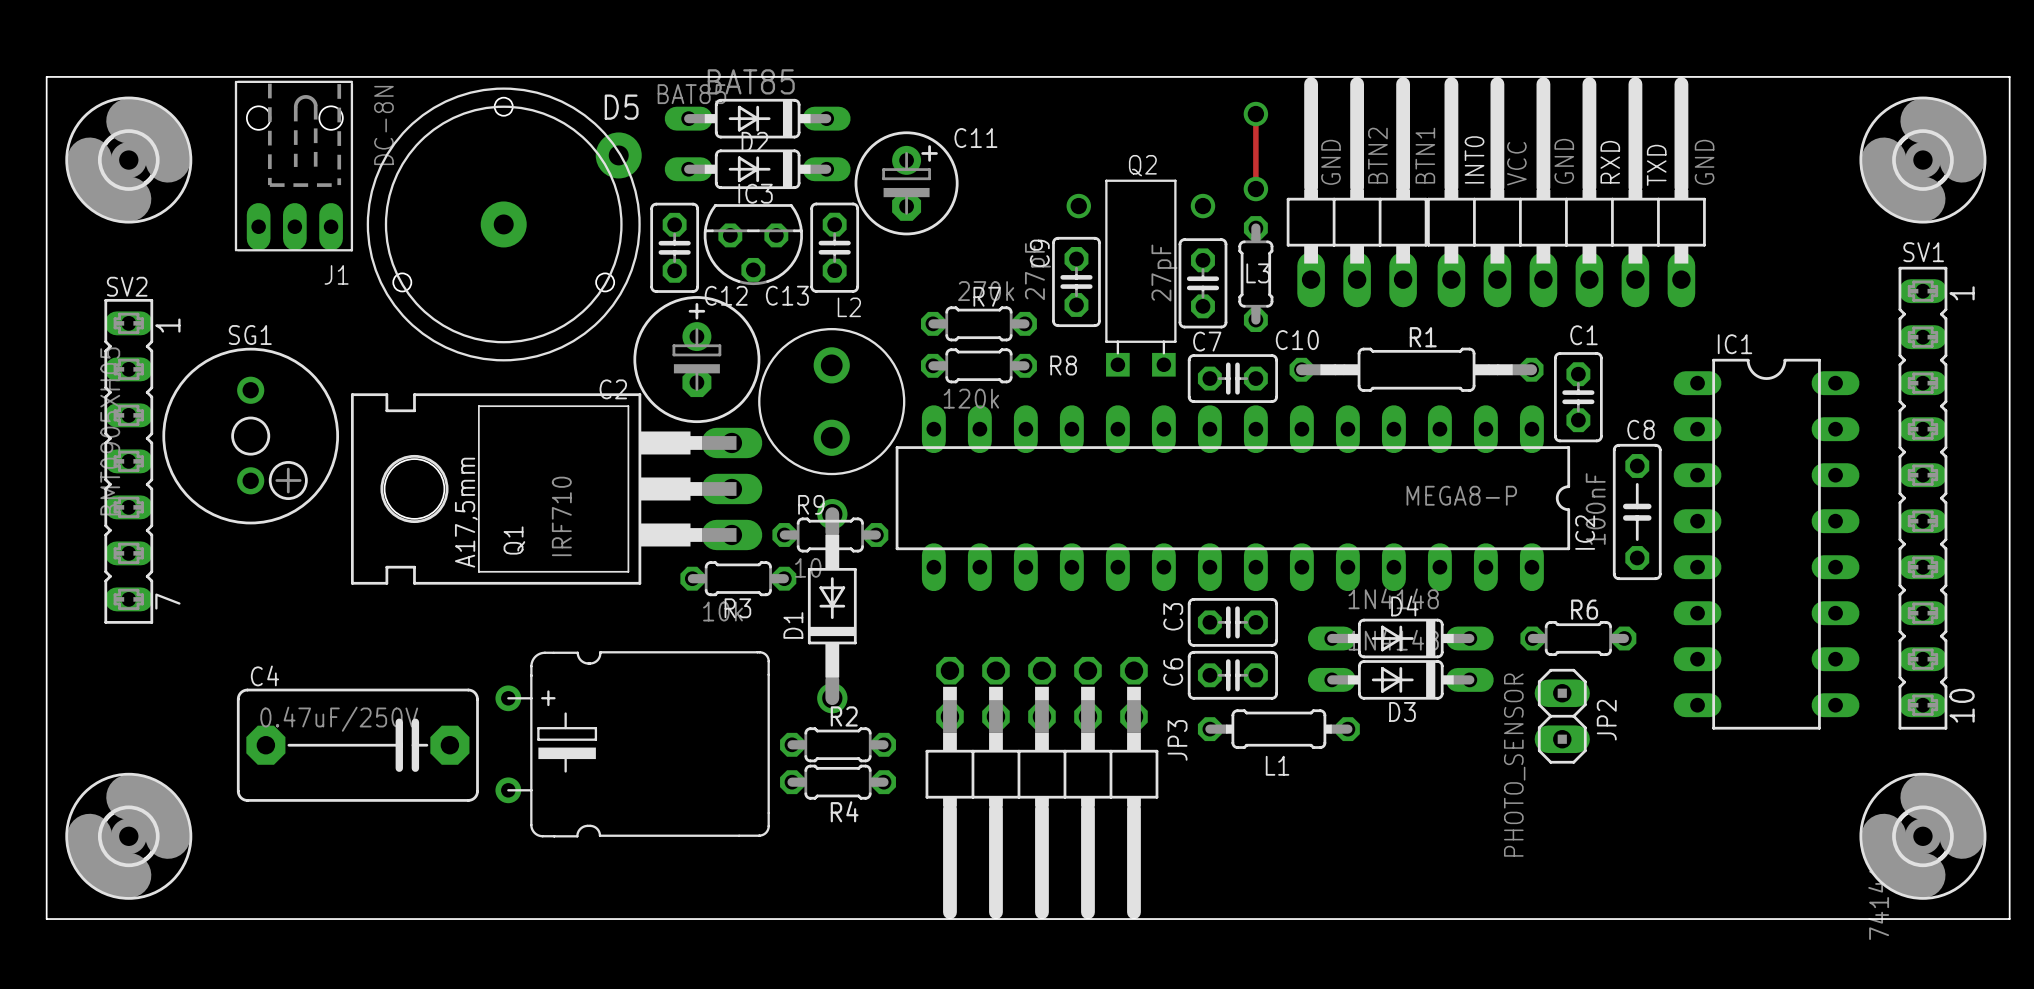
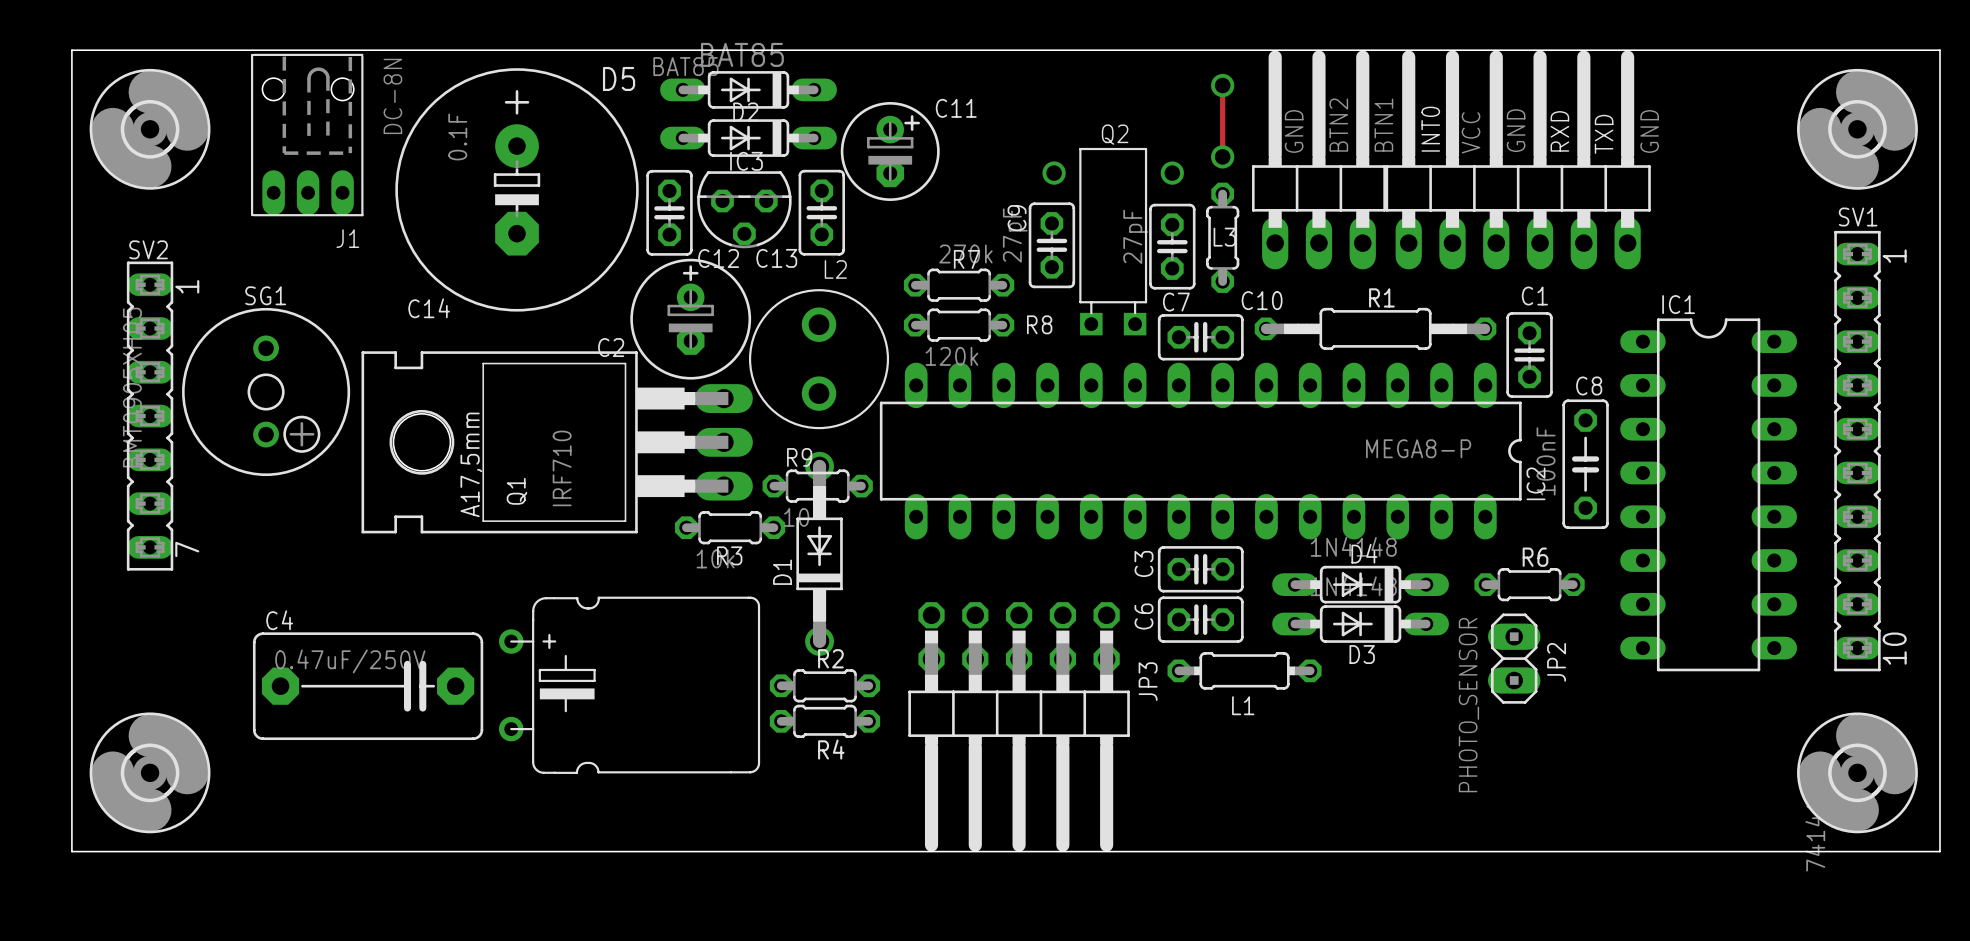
C14: none -> 0.1F (517, 189)
part: (504, 224) -> none

